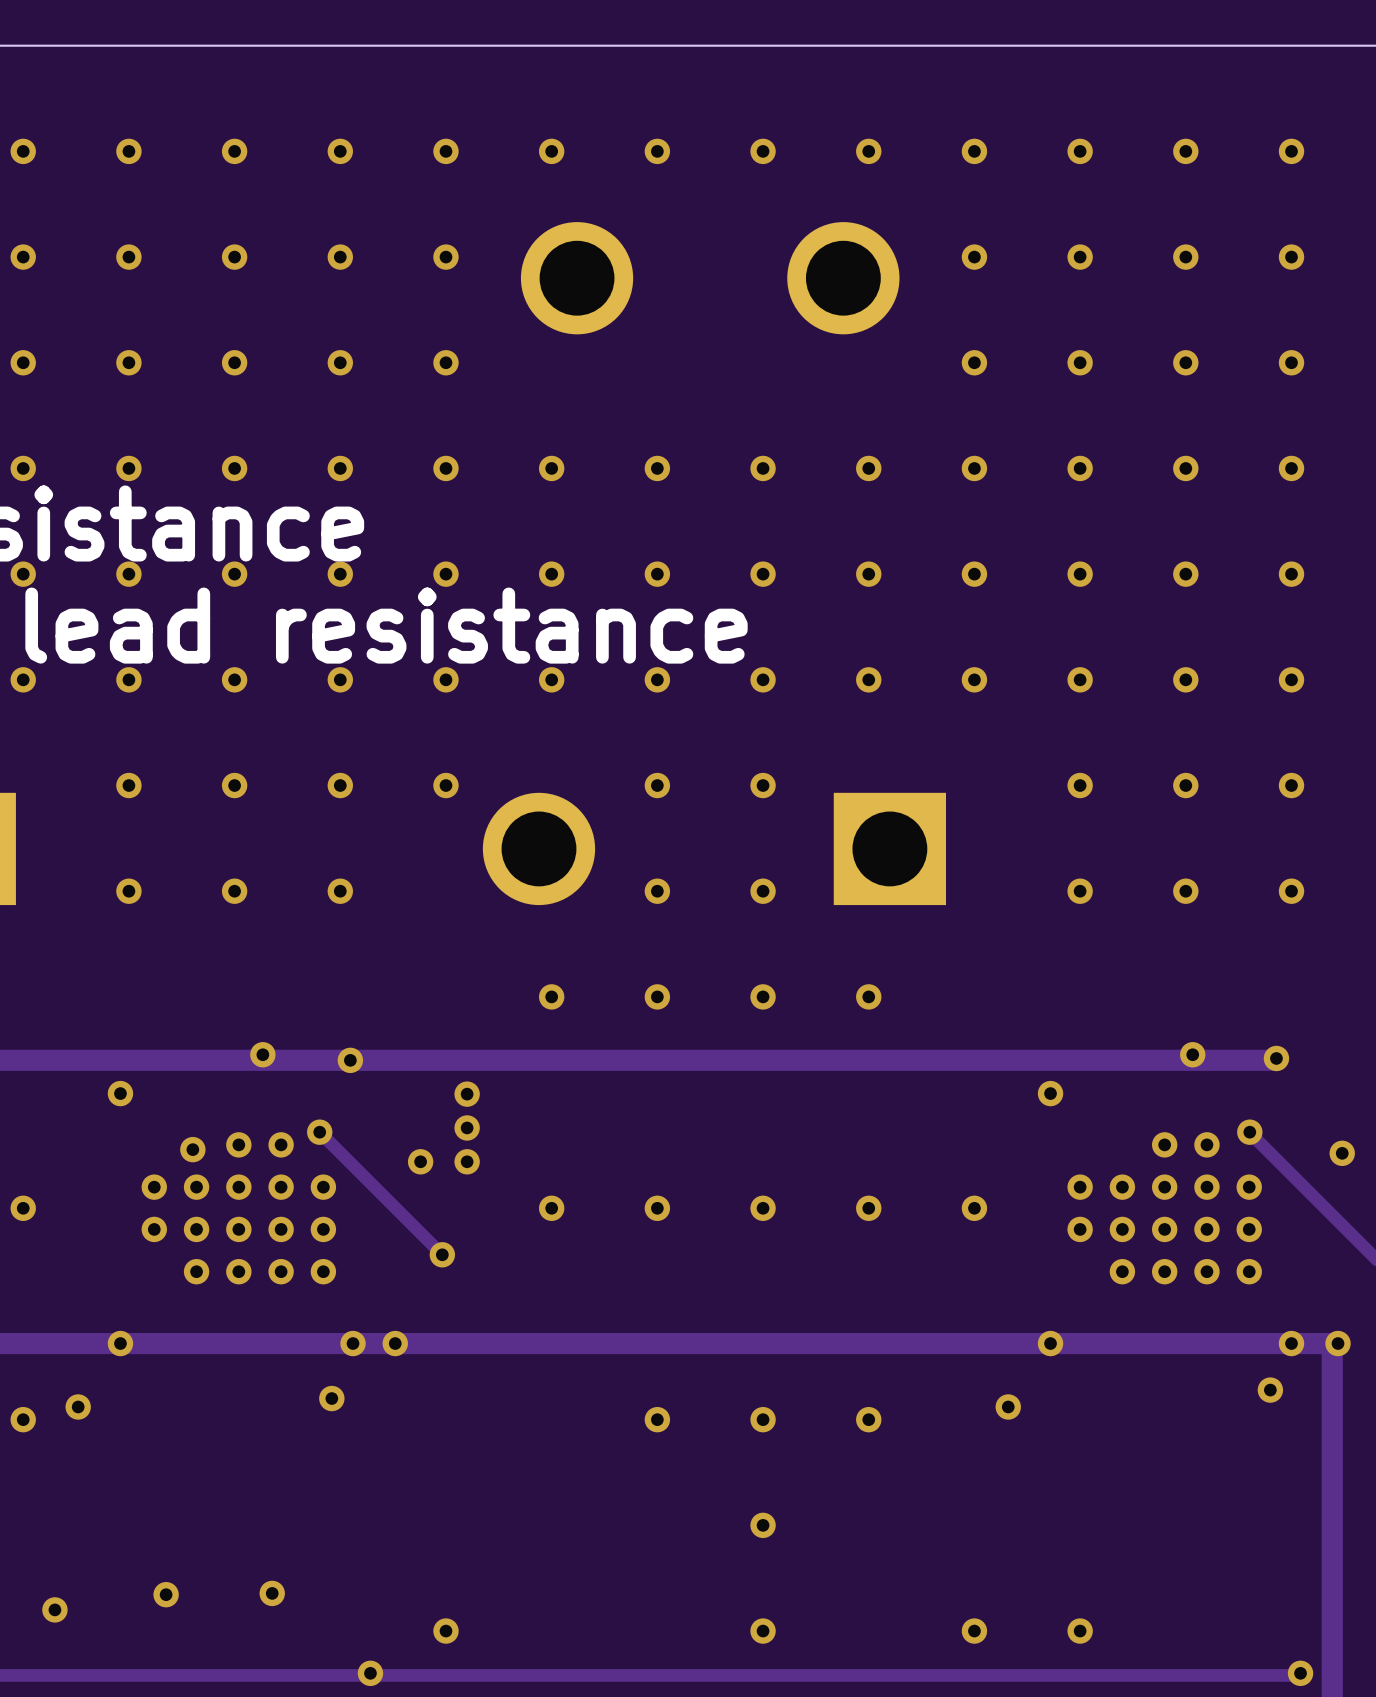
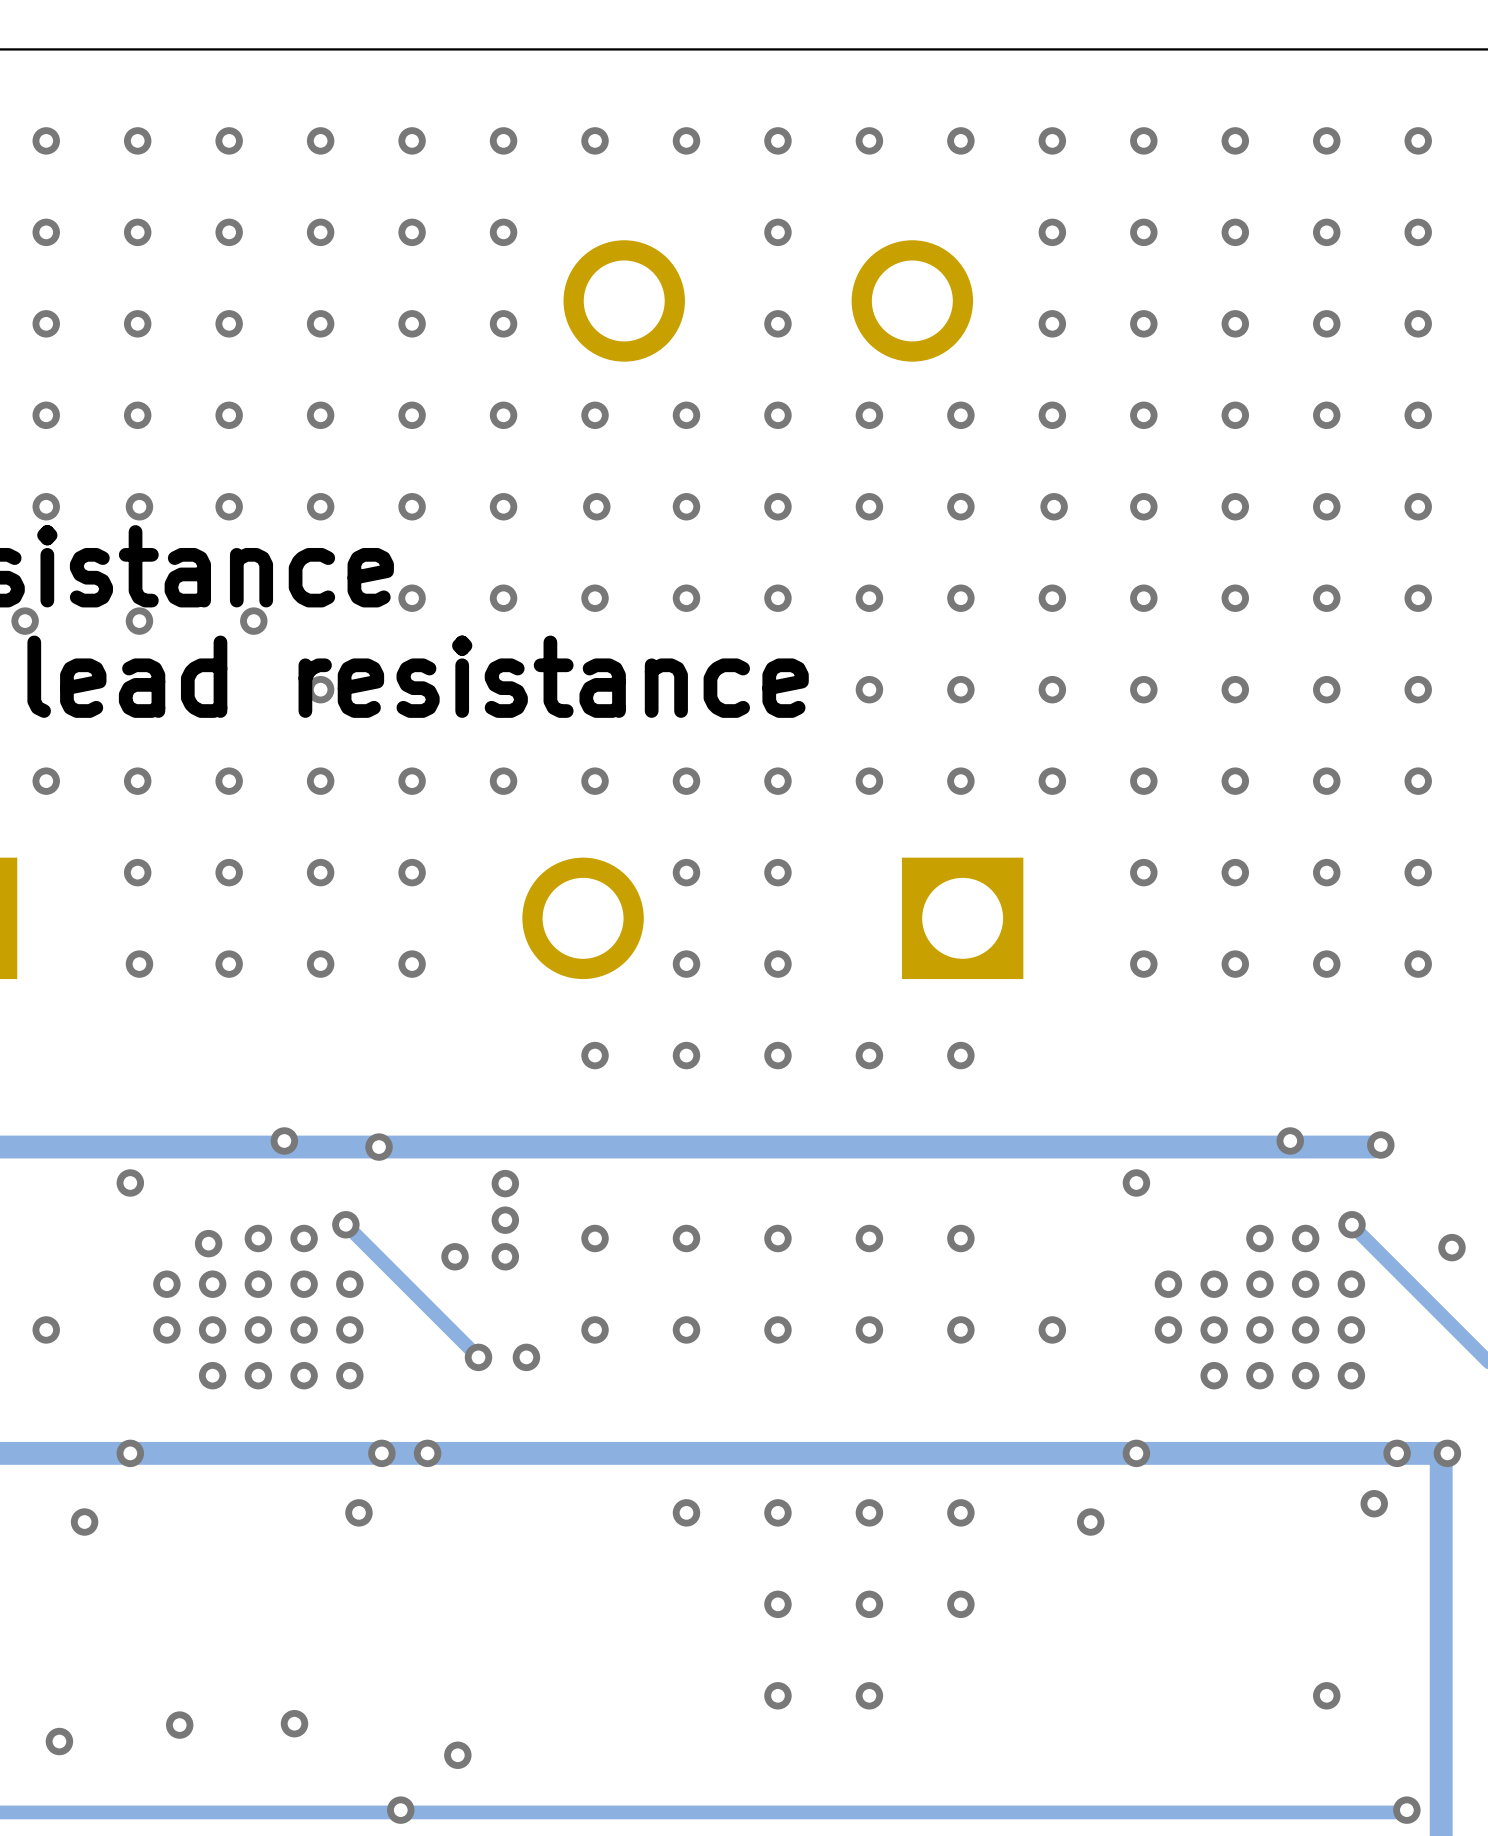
via: none -> (320, 140)
via: none -> (412, 140)
via: none -> (777, 140)
via: none -> (869, 140)
via: none -> (1235, 140)
via: none -> (1326, 140)
via position: (23, 151) -> (46, 140)
via position: (128, 151) -> (137, 140)
via position: (234, 151) -> (229, 140)
via: (340, 151) -> none
via position: (445, 151) -> (503, 140)
via position: (551, 151) -> (595, 140)
via position: (657, 151) -> (686, 140)
via: (763, 151) -> none
via position: (868, 151) -> (960, 140)
via position: (974, 151) -> (1052, 140)
via position: (1080, 151) -> (1143, 140)
via: (1185, 151) -> none
via position: (1291, 151) -> (1418, 140)
via: none -> (46, 232)
via: none -> (137, 232)
via: none -> (229, 232)
via: none -> (320, 232)
via: none -> (412, 232)
via: none -> (503, 232)
via: none -> (777, 232)
via: none -> (1052, 232)
via: none -> (1143, 232)
via: none -> (1235, 232)
via: none -> (1326, 232)
via: none -> (1418, 232)
via: (23, 257) -> none
via: (128, 257) -> none
via: (234, 257) -> none
via: (340, 257) -> none
via: (445, 257) -> none
via: (974, 257) -> none
via: (1080, 257) -> none
via: (1185, 257) -> none
via: (1291, 257) -> none
via: none -> (46, 323)
via: none -> (137, 323)
via: none -> (229, 323)
via: none -> (320, 323)
via: none -> (412, 323)
via: none -> (503, 323)
via: none -> (777, 323)
via: none -> (1052, 323)
via: none -> (1143, 323)
via: none -> (1235, 323)
via: none -> (1326, 323)
via: none -> (1418, 323)
via position: (23, 362) -> (46, 415)
via position: (128, 362) -> (137, 415)
via position: (234, 362) -> (229, 415)
via: (340, 362) -> none
via position: (445, 362) -> (503, 415)
via position: (974, 362) -> (1052, 415)
via position: (1080, 362) -> (1143, 415)
via: (1185, 362) -> none
via position: (1291, 362) -> (1418, 415)
via: none -> (320, 415)
via: none -> (412, 415)
via: none -> (595, 415)
via: none -> (686, 415)
via: none -> (777, 415)
via: none -> (869, 415)
via: none -> (960, 415)
via: none -> (1235, 415)
via: none -> (1326, 415)
via position: (23, 468) -> (46, 506)
via position: (234, 468) -> (229, 506)
via: none -> (320, 506)
via: (340, 468) -> none
via: none -> (412, 506)
via position: (445, 468) -> (503, 506)
via position: (657, 468) -> (686, 506)
via: none -> (777, 506)
via: (763, 468) -> none
via: none -> (869, 506)
via position: (868, 468) -> (960, 506)
via position: (1080, 468) -> (1143, 506)
via: none -> (1235, 506)
via: (1185, 468) -> none
via: none -> (1326, 506)
via position: (1291, 468) -> (1418, 506)
via: none -> (412, 598)
via: none -> (777, 598)
via: none -> (869, 598)
via: none -> (1235, 598)
via: none -> (1326, 598)
via: (340, 574) -> none
via position: (445, 574) -> (503, 598)
via position: (551, 574) -> (595, 598)
via position: (657, 574) -> (686, 598)
via: (763, 574) -> none
via position: (868, 574) -> (960, 598)
via position: (974, 574) -> (1052, 598)
via position: (1080, 574) -> (1143, 598)
via: (1185, 574) -> none
via position: (1291, 574) -> (1418, 598)
via: none -> (320, 689)
via: none -> (869, 689)
via: none -> (960, 689)
via: none -> (1052, 689)
via: none -> (1143, 689)
via: none -> (1235, 689)
via: none -> (1326, 689)
via: none -> (1418, 689)
via: (23, 679) -> none
via: (128, 679) -> none
via: (234, 679) -> none
via: (340, 679) -> none
via: (445, 679) -> none
via position: (551, 679) -> (595, 781)
via: (657, 679) -> none
via: (763, 679) -> none
via: (868, 679) -> none
via: (974, 679) -> none
via: (1080, 679) -> none
via: (1185, 679) -> none
via: (1291, 679) -> none
via: none -> (46, 781)
via: none -> (137, 781)
via: none -> (229, 781)
via: none -> (320, 781)
via: none -> (412, 781)
via: none -> (503, 781)
via: none -> (686, 781)
via: none -> (777, 781)
via: none -> (869, 781)
via: none -> (960, 781)
via: none -> (1052, 781)
via: none -> (1143, 781)
via: none -> (1235, 781)
via: none -> (1326, 781)
via: none -> (1418, 781)
via position: (128, 785) -> (137, 872)
via position: (234, 785) -> (229, 872)
via: (340, 785) -> none
via: (445, 785) -> none
via position: (657, 785) -> (686, 872)
via: (763, 785) -> none
via position: (1080, 785) -> (1143, 872)
via: (1185, 785) -> none
via position: (1291, 785) -> (1418, 872)
via: none -> (320, 872)
via: none -> (412, 872)
via: none -> (777, 872)
via: none -> (1235, 872)
via: none -> (1326, 872)
via position: (234, 891) -> (229, 964)
via: none -> (320, 964)
via: (340, 891) -> none
via: none -> (412, 964)
via position: (657, 891) -> (686, 964)
via: none -> (777, 964)
via: (763, 891) -> none
via position: (1080, 891) -> (1143, 964)
via: none -> (1235, 964)
via: (1185, 891) -> none
via: none -> (1326, 964)
via position: (1291, 891) -> (1418, 964)
via: none -> (777, 1055)
via: none -> (869, 1055)
via position: (551, 996) -> (595, 1055)
via position: (657, 996) -> (686, 1055)
via: (763, 996) -> none
via position: (868, 996) -> (960, 1055)
via: none -> (595, 1238)
via: none -> (686, 1238)
via: none -> (777, 1238)
via: none -> (869, 1238)
via: none -> (960, 1238)
via position: (23, 1208) -> (46, 1329)
via position: (551, 1208) -> (595, 1329)
via position: (657, 1208) -> (686, 1329)
via: (763, 1208) -> none
via position: (868, 1208) -> (960, 1329)
via position: (974, 1208) -> (1052, 1329)
via: none -> (777, 1329)
via: none -> (869, 1329)
via: none -> (526, 1357)
via: none -> (777, 1512)
via: none -> (869, 1512)
via: (23, 1419) -> none
via position: (657, 1419) -> (686, 1512)
via: (763, 1419) -> none
via position: (868, 1419) -> (960, 1512)
via: none -> (777, 1604)
via: none -> (869, 1604)
via: none -> (960, 1604)
via: (763, 1525) -> none
via: none -> (777, 1695)
via: none -> (869, 1695)
via: none -> (1326, 1695)
via position: (445, 1631) -> (457, 1755)
via: (763, 1631) -> none
via: (974, 1631) -> none
via: (1080, 1631) -> none

